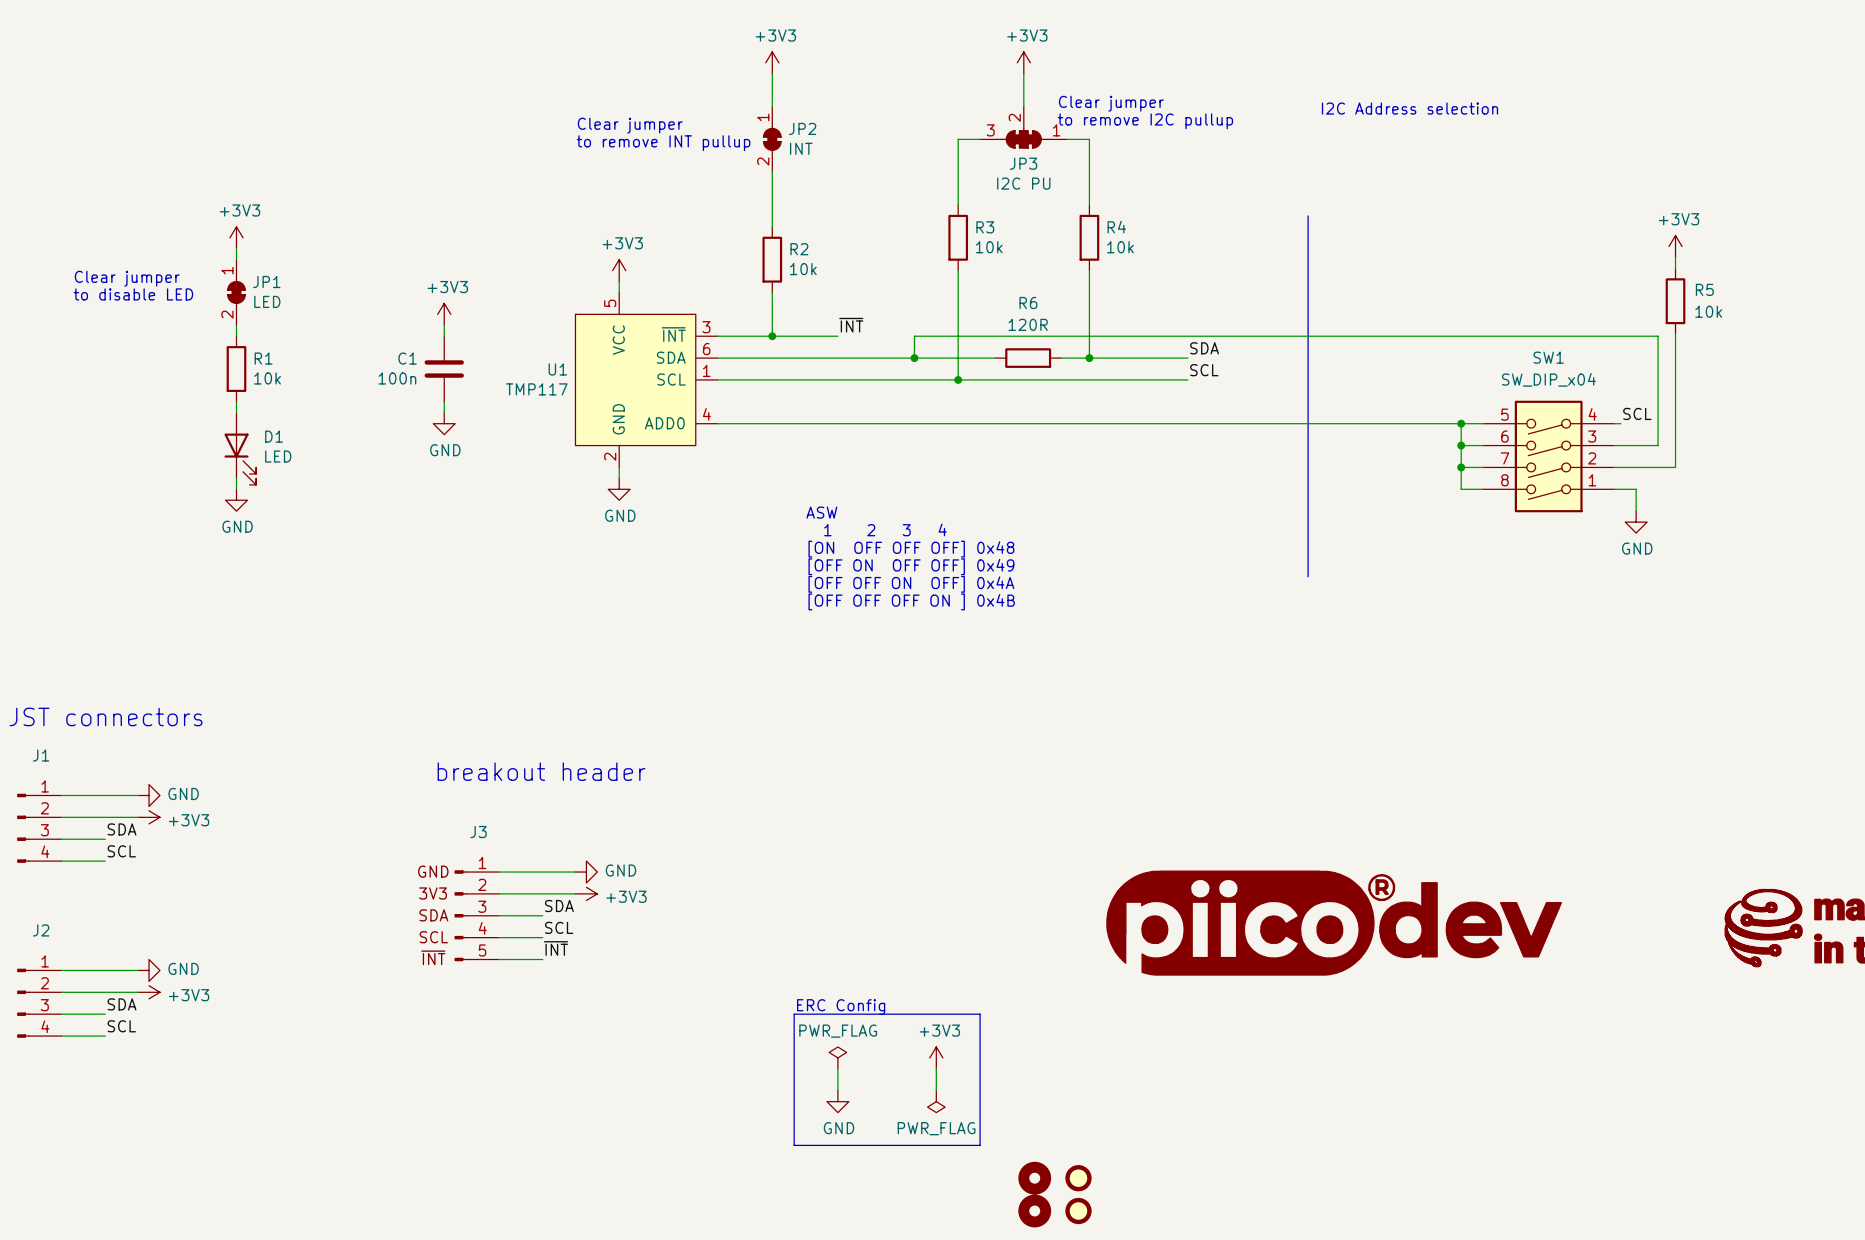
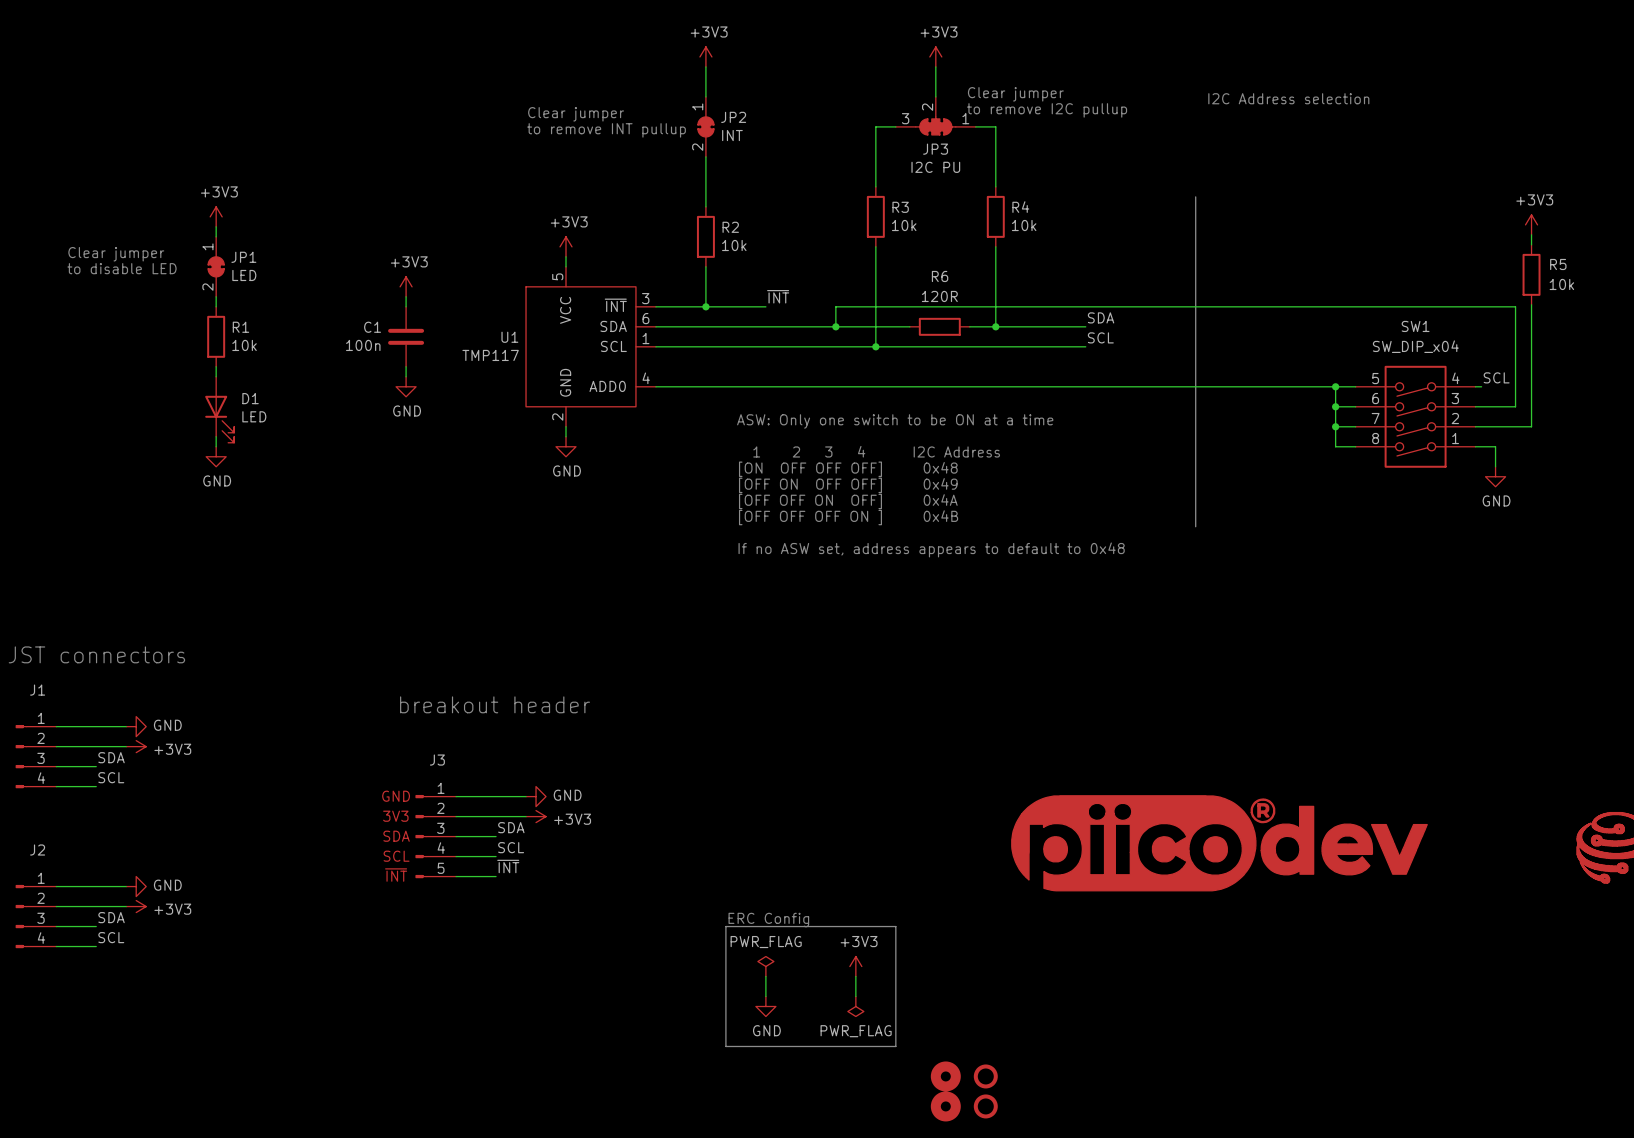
text: none -> ASW: Only one switch to be ON at a time (895, 421)
text: none -> 1 2 3 4 I2C Address (876, 451)
text: ASW (821, 512) -> [ON OFF OFF OFF] 0x48 (848, 469)
text: 1 2 3 4 (885, 529) -> [OFF ON OFF OFF] 0x49 (848, 485)
text: [ON OFF OFF OFF] 0x48 (911, 549) -> [OFF OFF ON OFF] 0x4A (848, 501)
text: [OFF ON OFF OFF] 0x49 (911, 566) -> [OFF OFF OFF ON ] 0x4B (848, 517)
text: [OFF OFF ON OFF] 0x4A (911, 584) -> none
text: [OFF OFF OFF ON ] 0x4B (911, 601) -> If no ASW set, address appears to default to 0x48 (931, 549)

